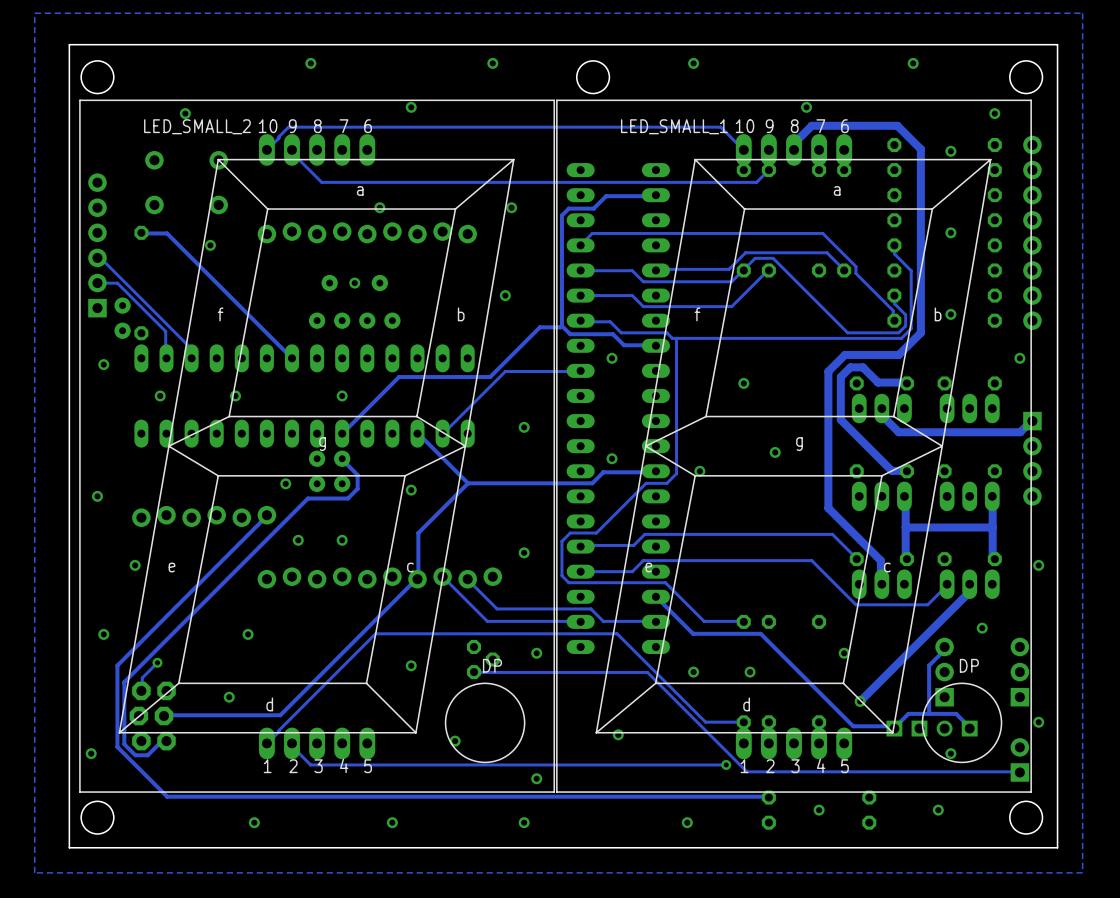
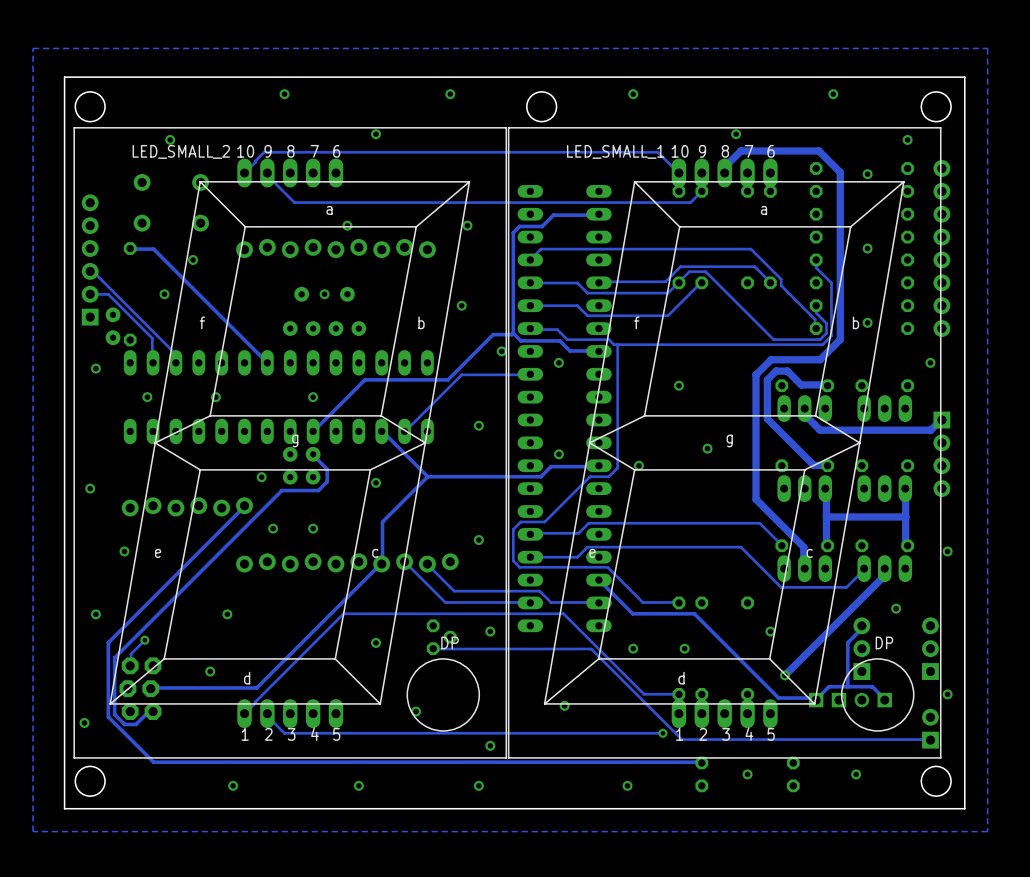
via: none -> (164, 294)
via: none -> (501, 351)
via: (950, 753) -> none

